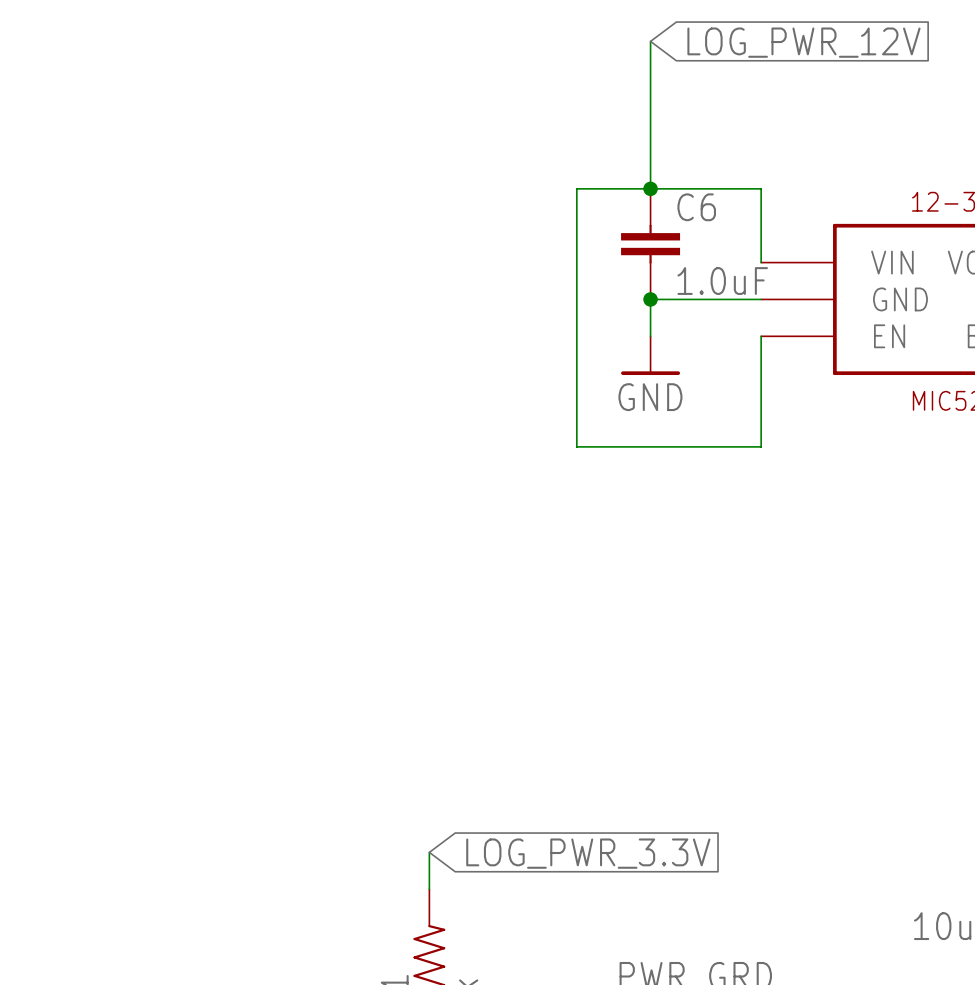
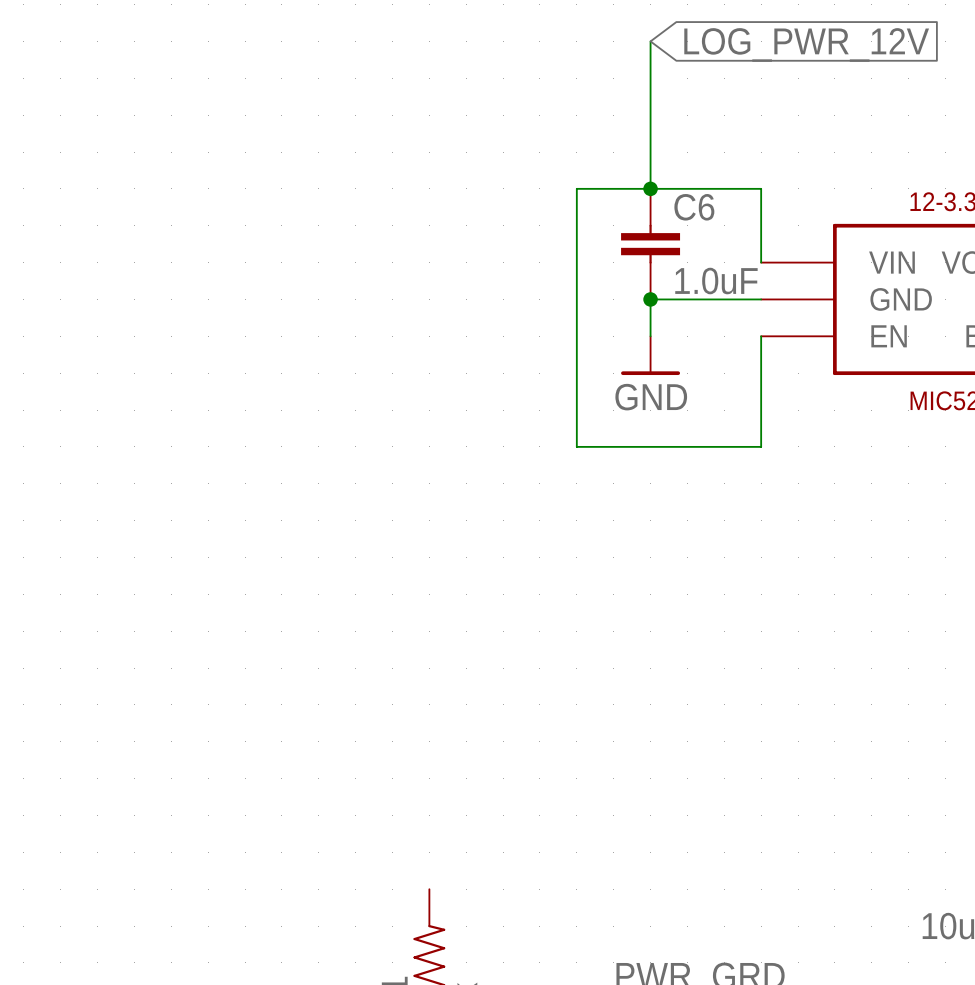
wire: (429, 852) (429, 889) -> none
global label: LOG_PWR_3.3V (588, 853) -> none

